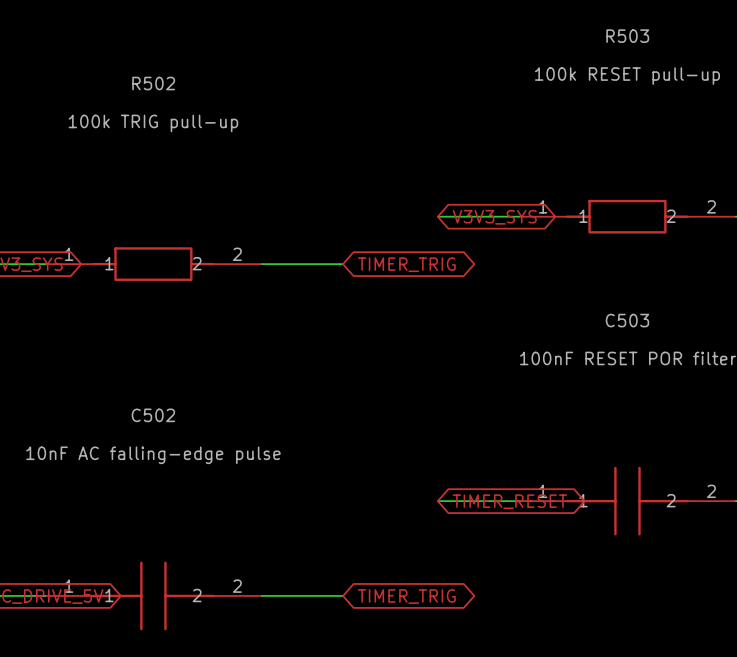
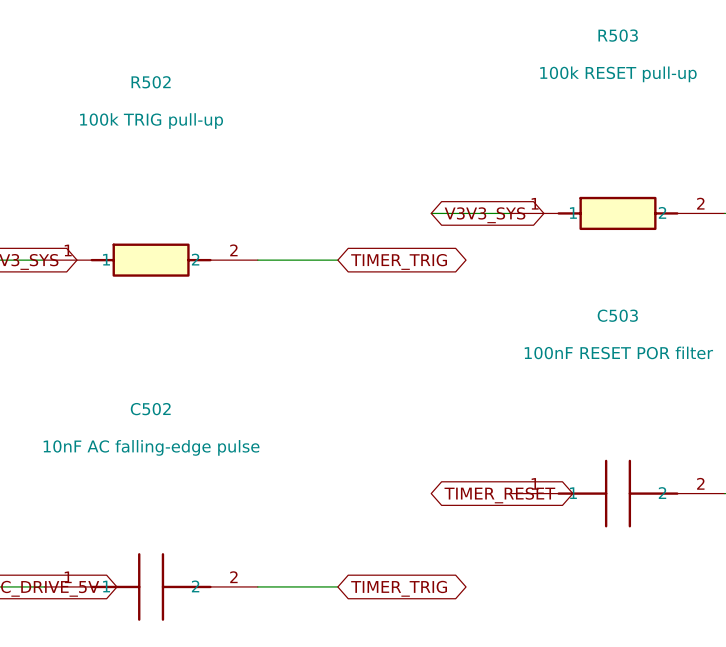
wire: (437, 501) (519, 501) -> none

